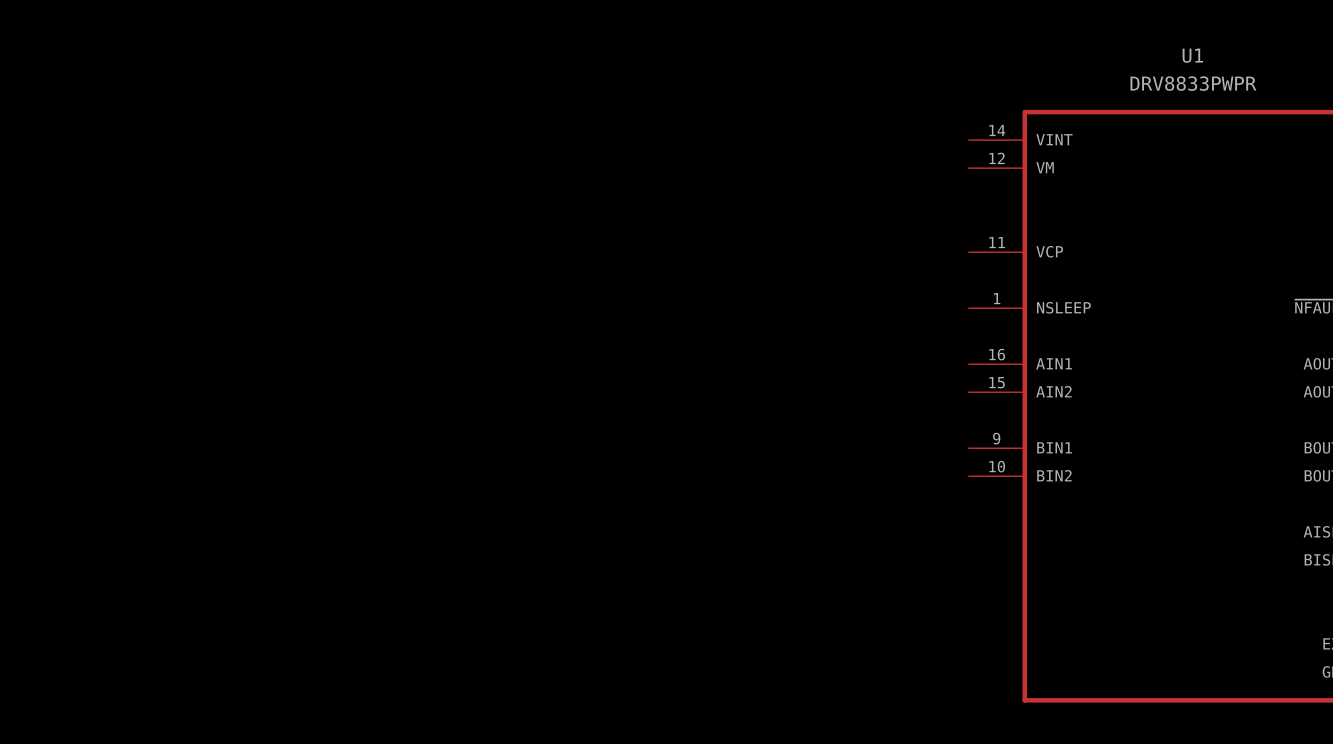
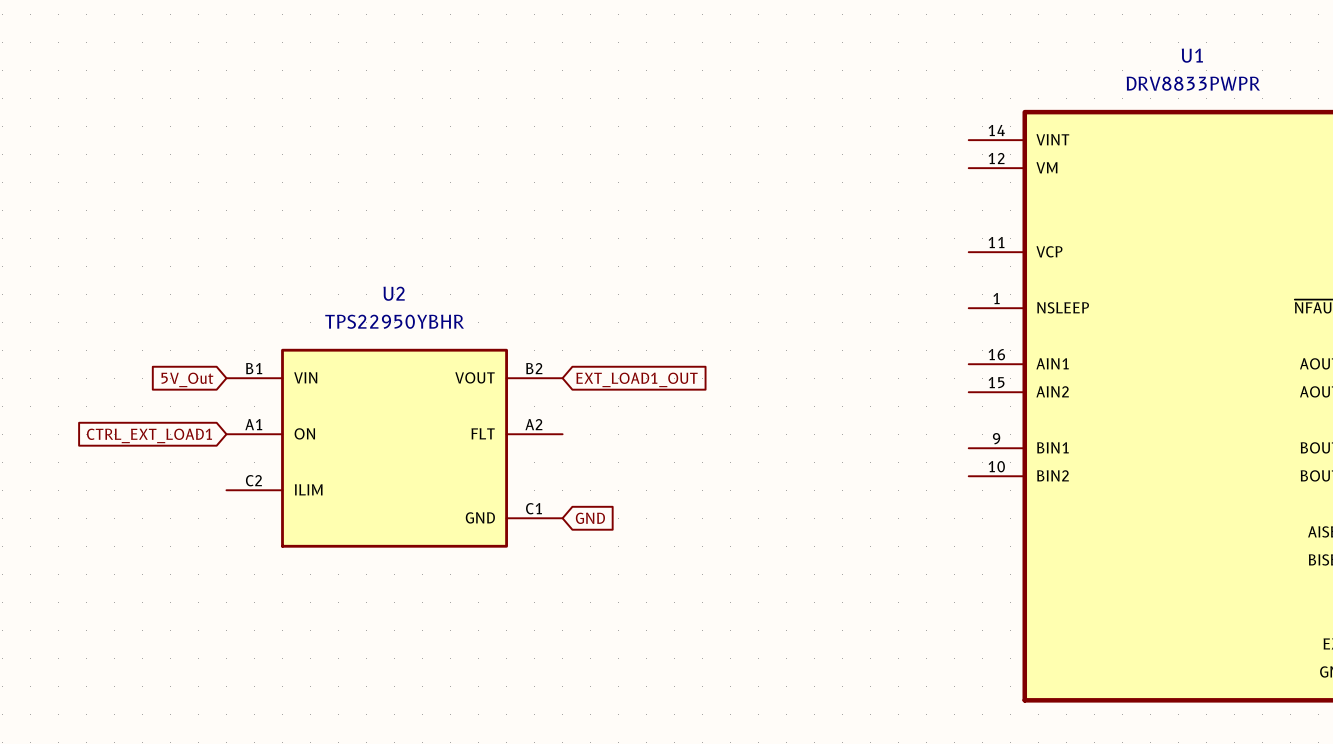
global label: none -> 5V_Out (187, 379)
global label: none -> EXT_LOAD1_OUT (637, 379)
global label: none -> CTRL_EXT_LOAD1 (149, 435)
U2: none -> TPS22950YBHR (394, 448)
global label: none -> GND (590, 518)

